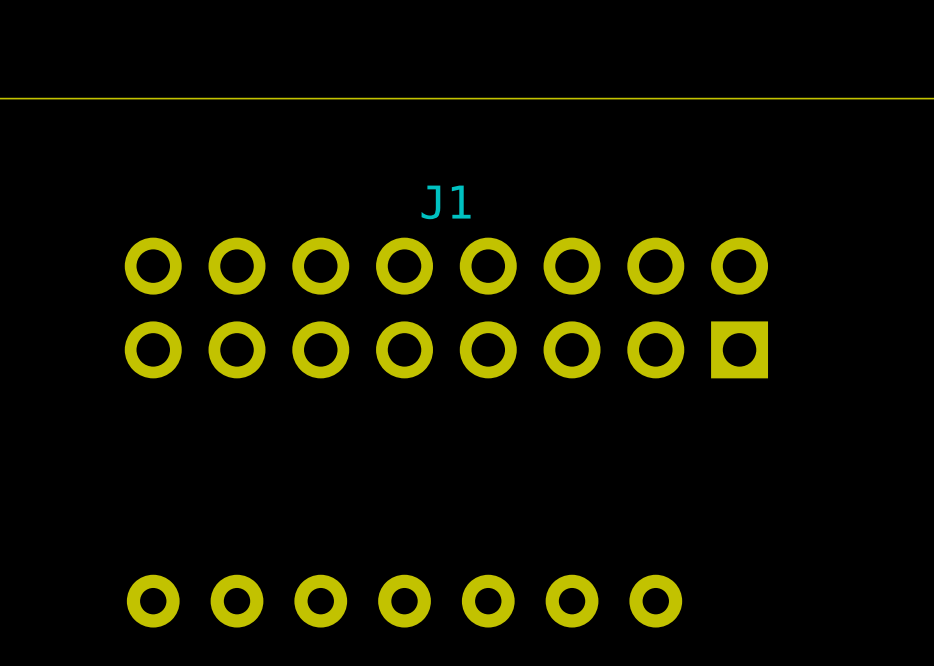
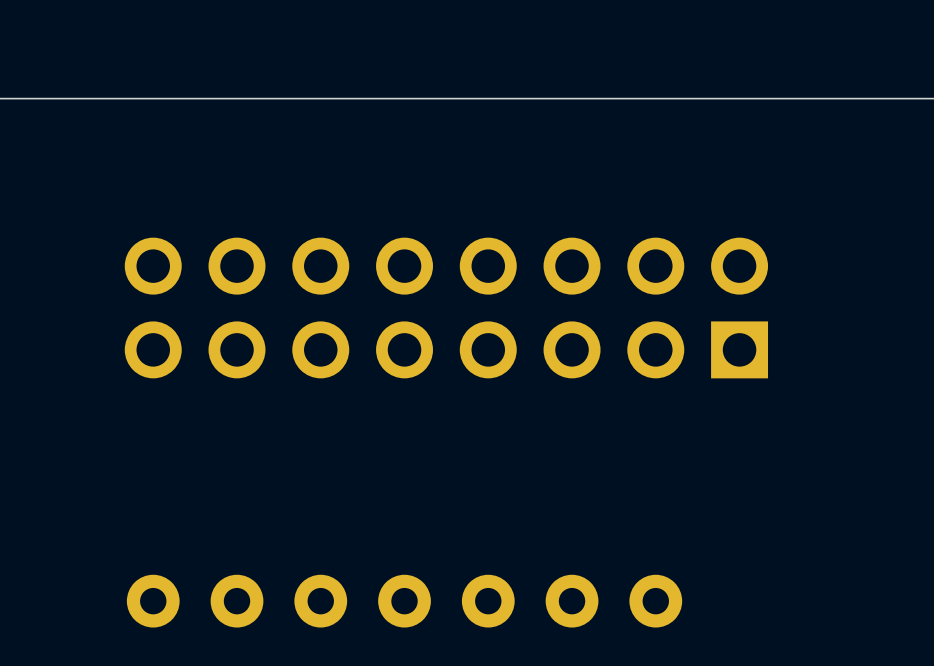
J1 name: J1 (446, 202) -> none

